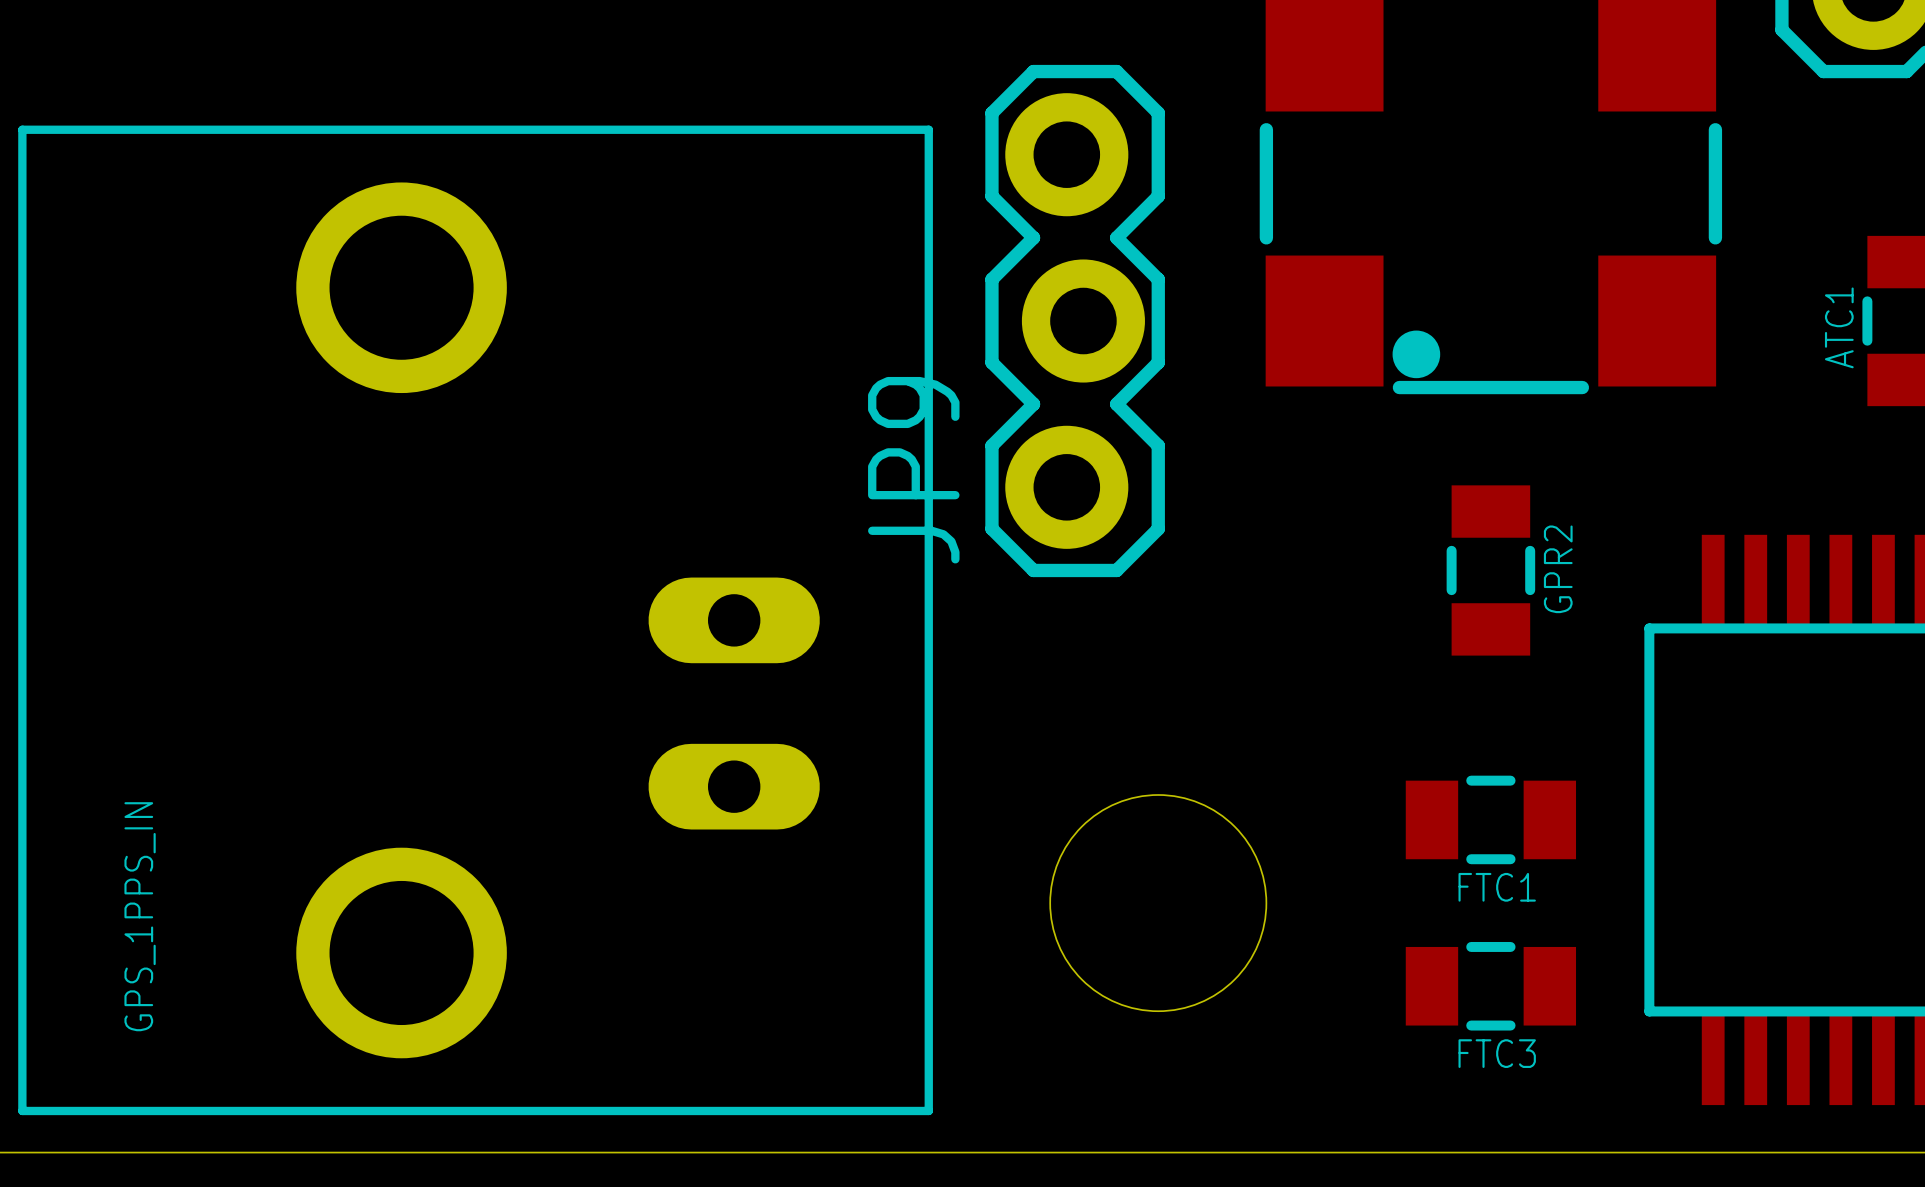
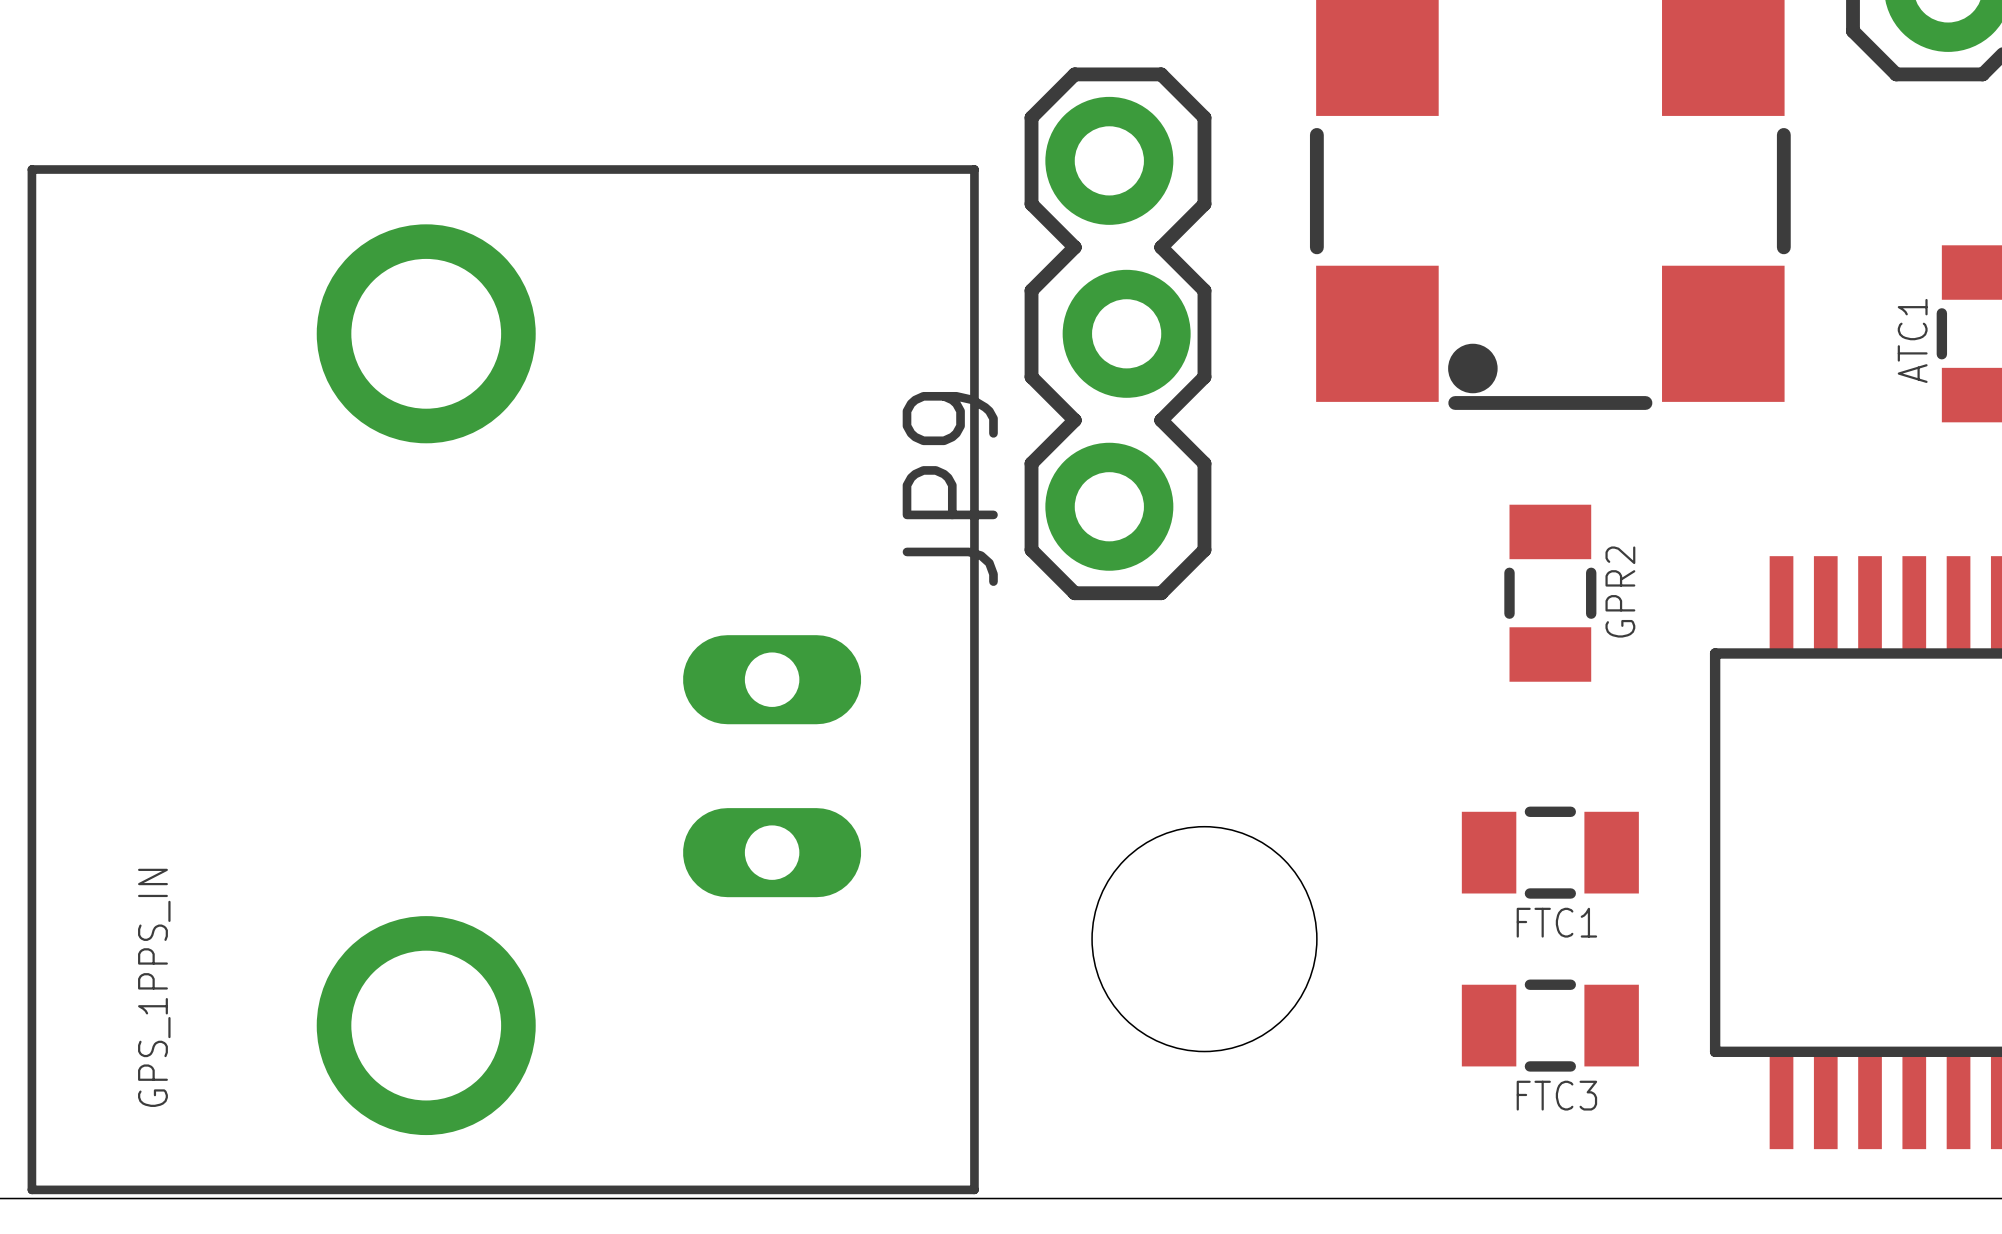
GPS_1PPS_IN position: (475, 620) -> (503, 679)

